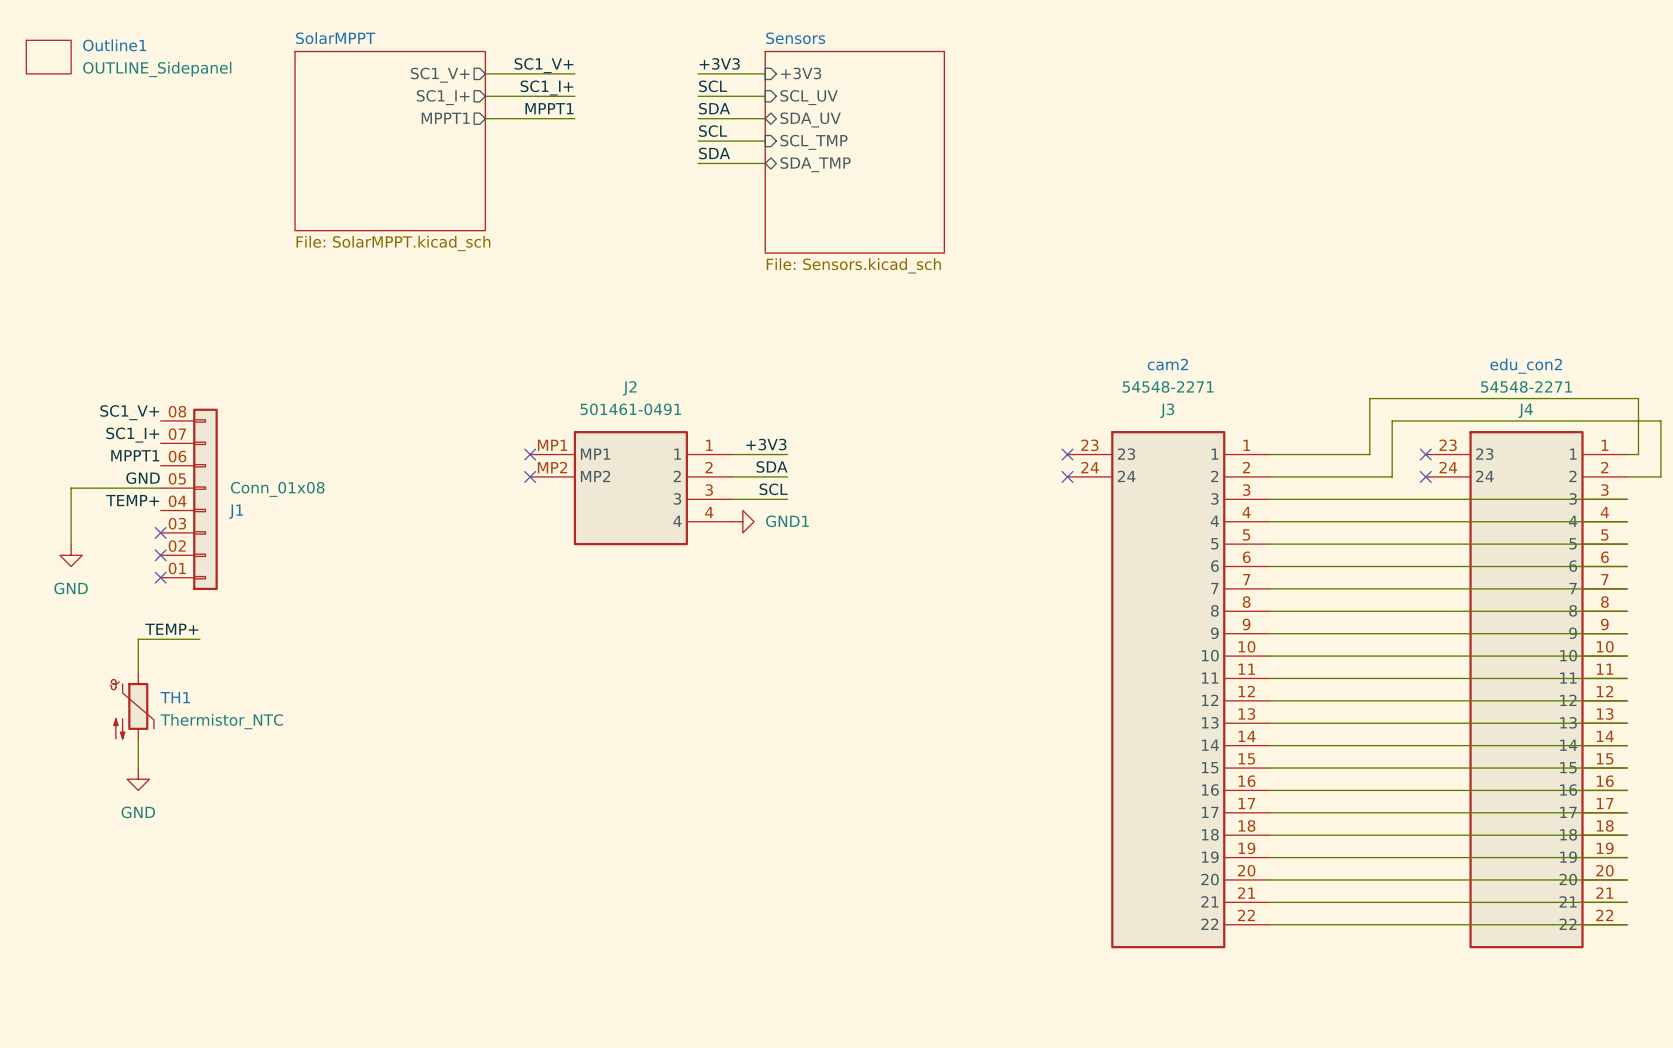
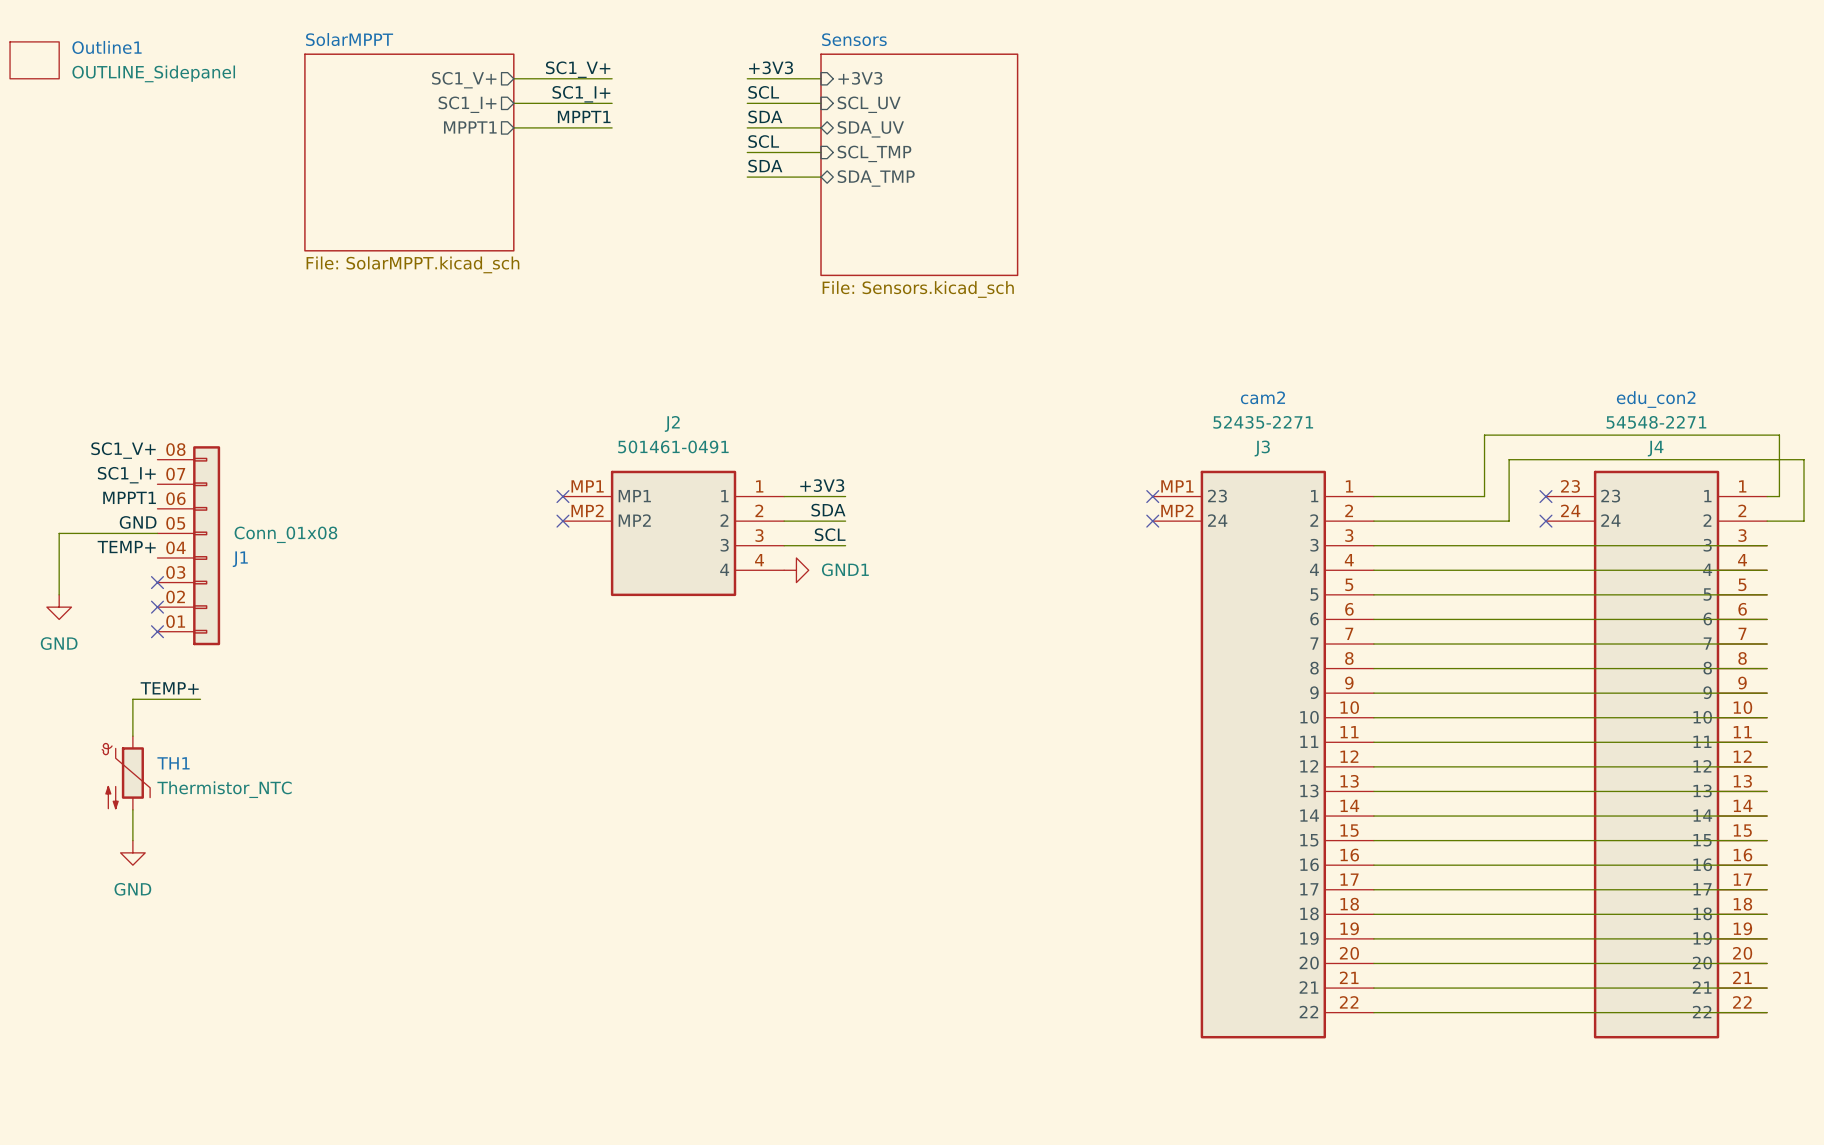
cam2 value: 54548-2271 (1168, 386) -> 52435-2271 (1263, 422)
cam2 pin number: 23 (1089, 445) -> MP1 (1177, 486)
cam2 pin number: 24 (1090, 467) -> MP2 (1177, 510)

